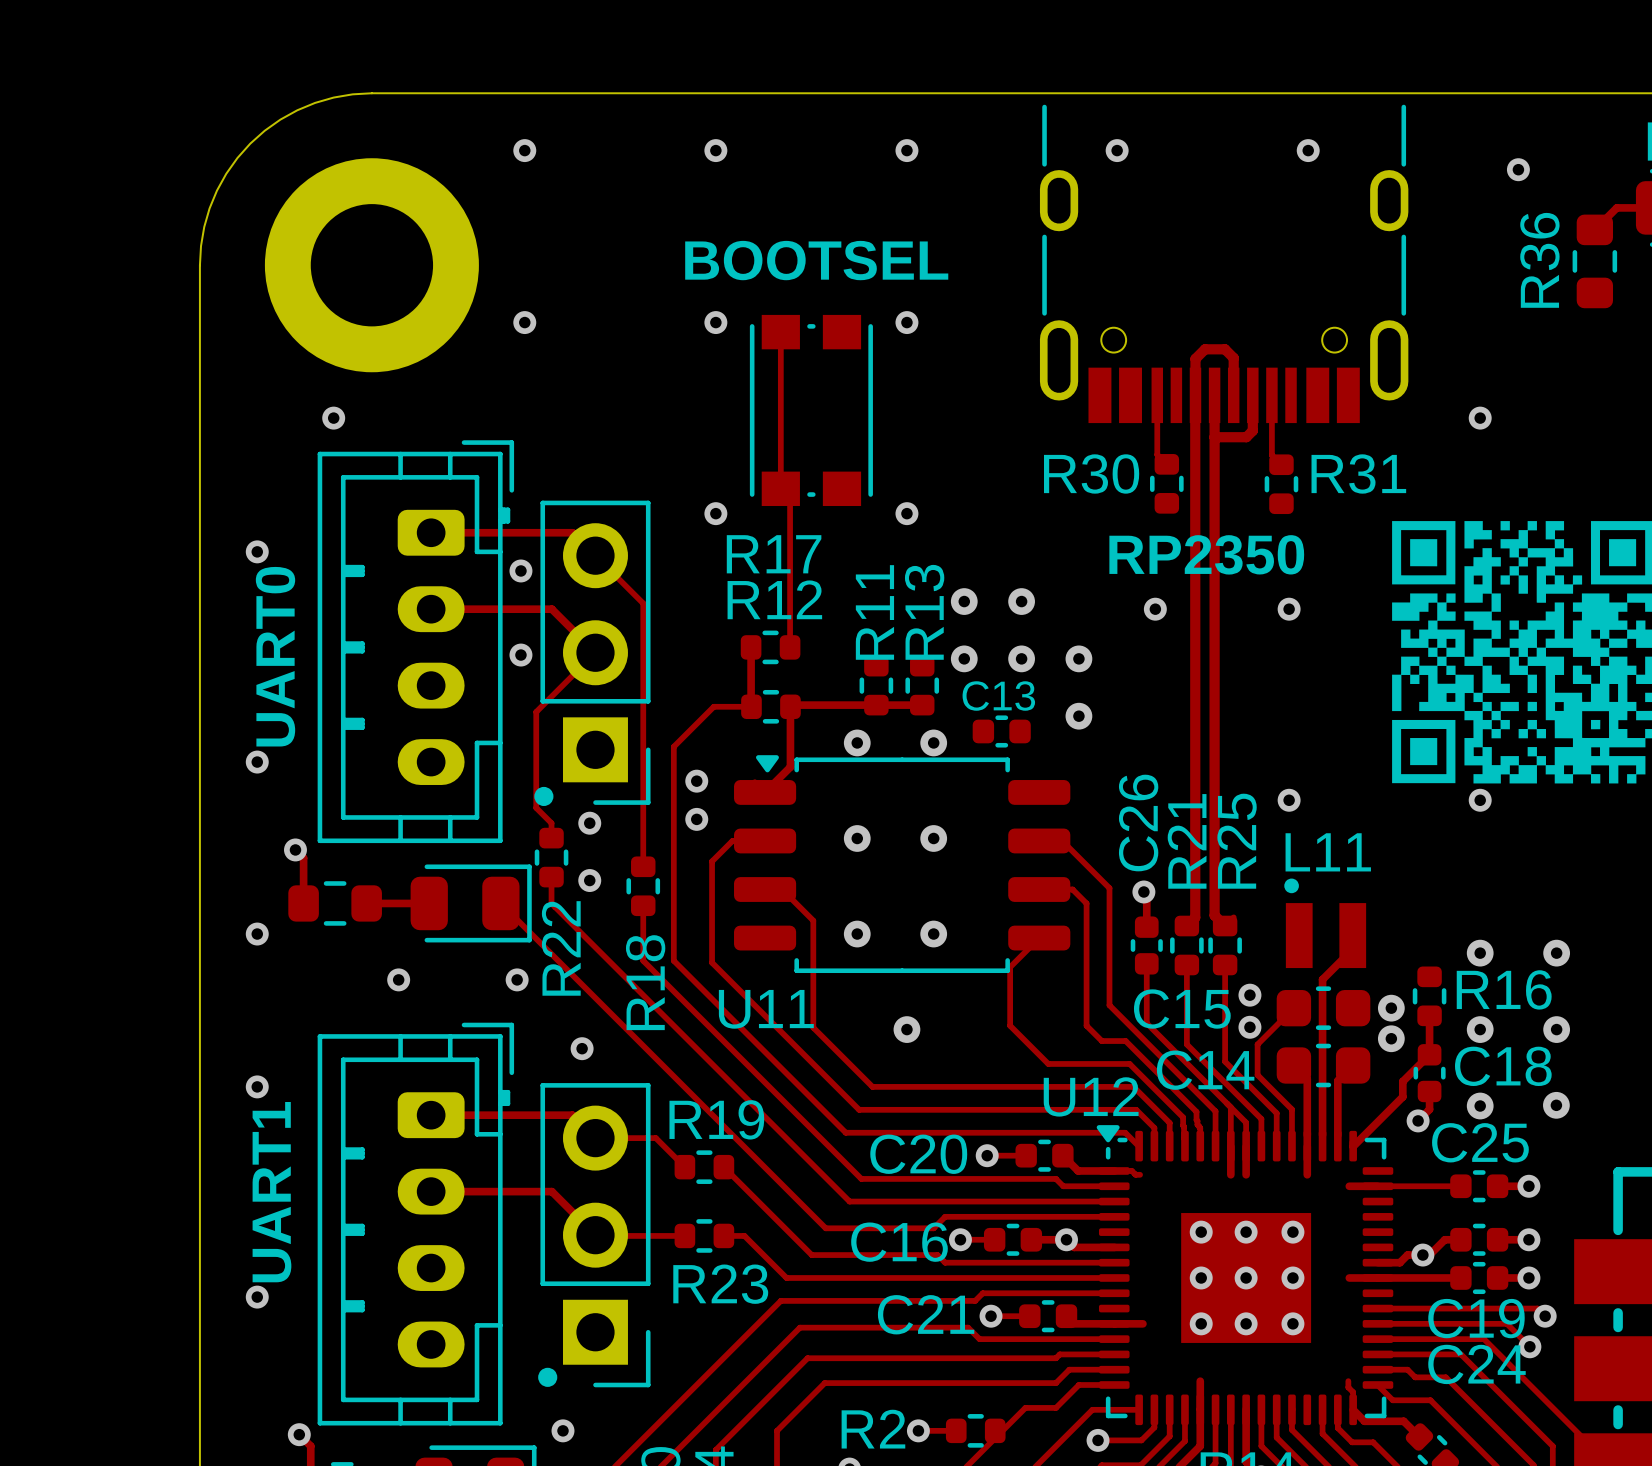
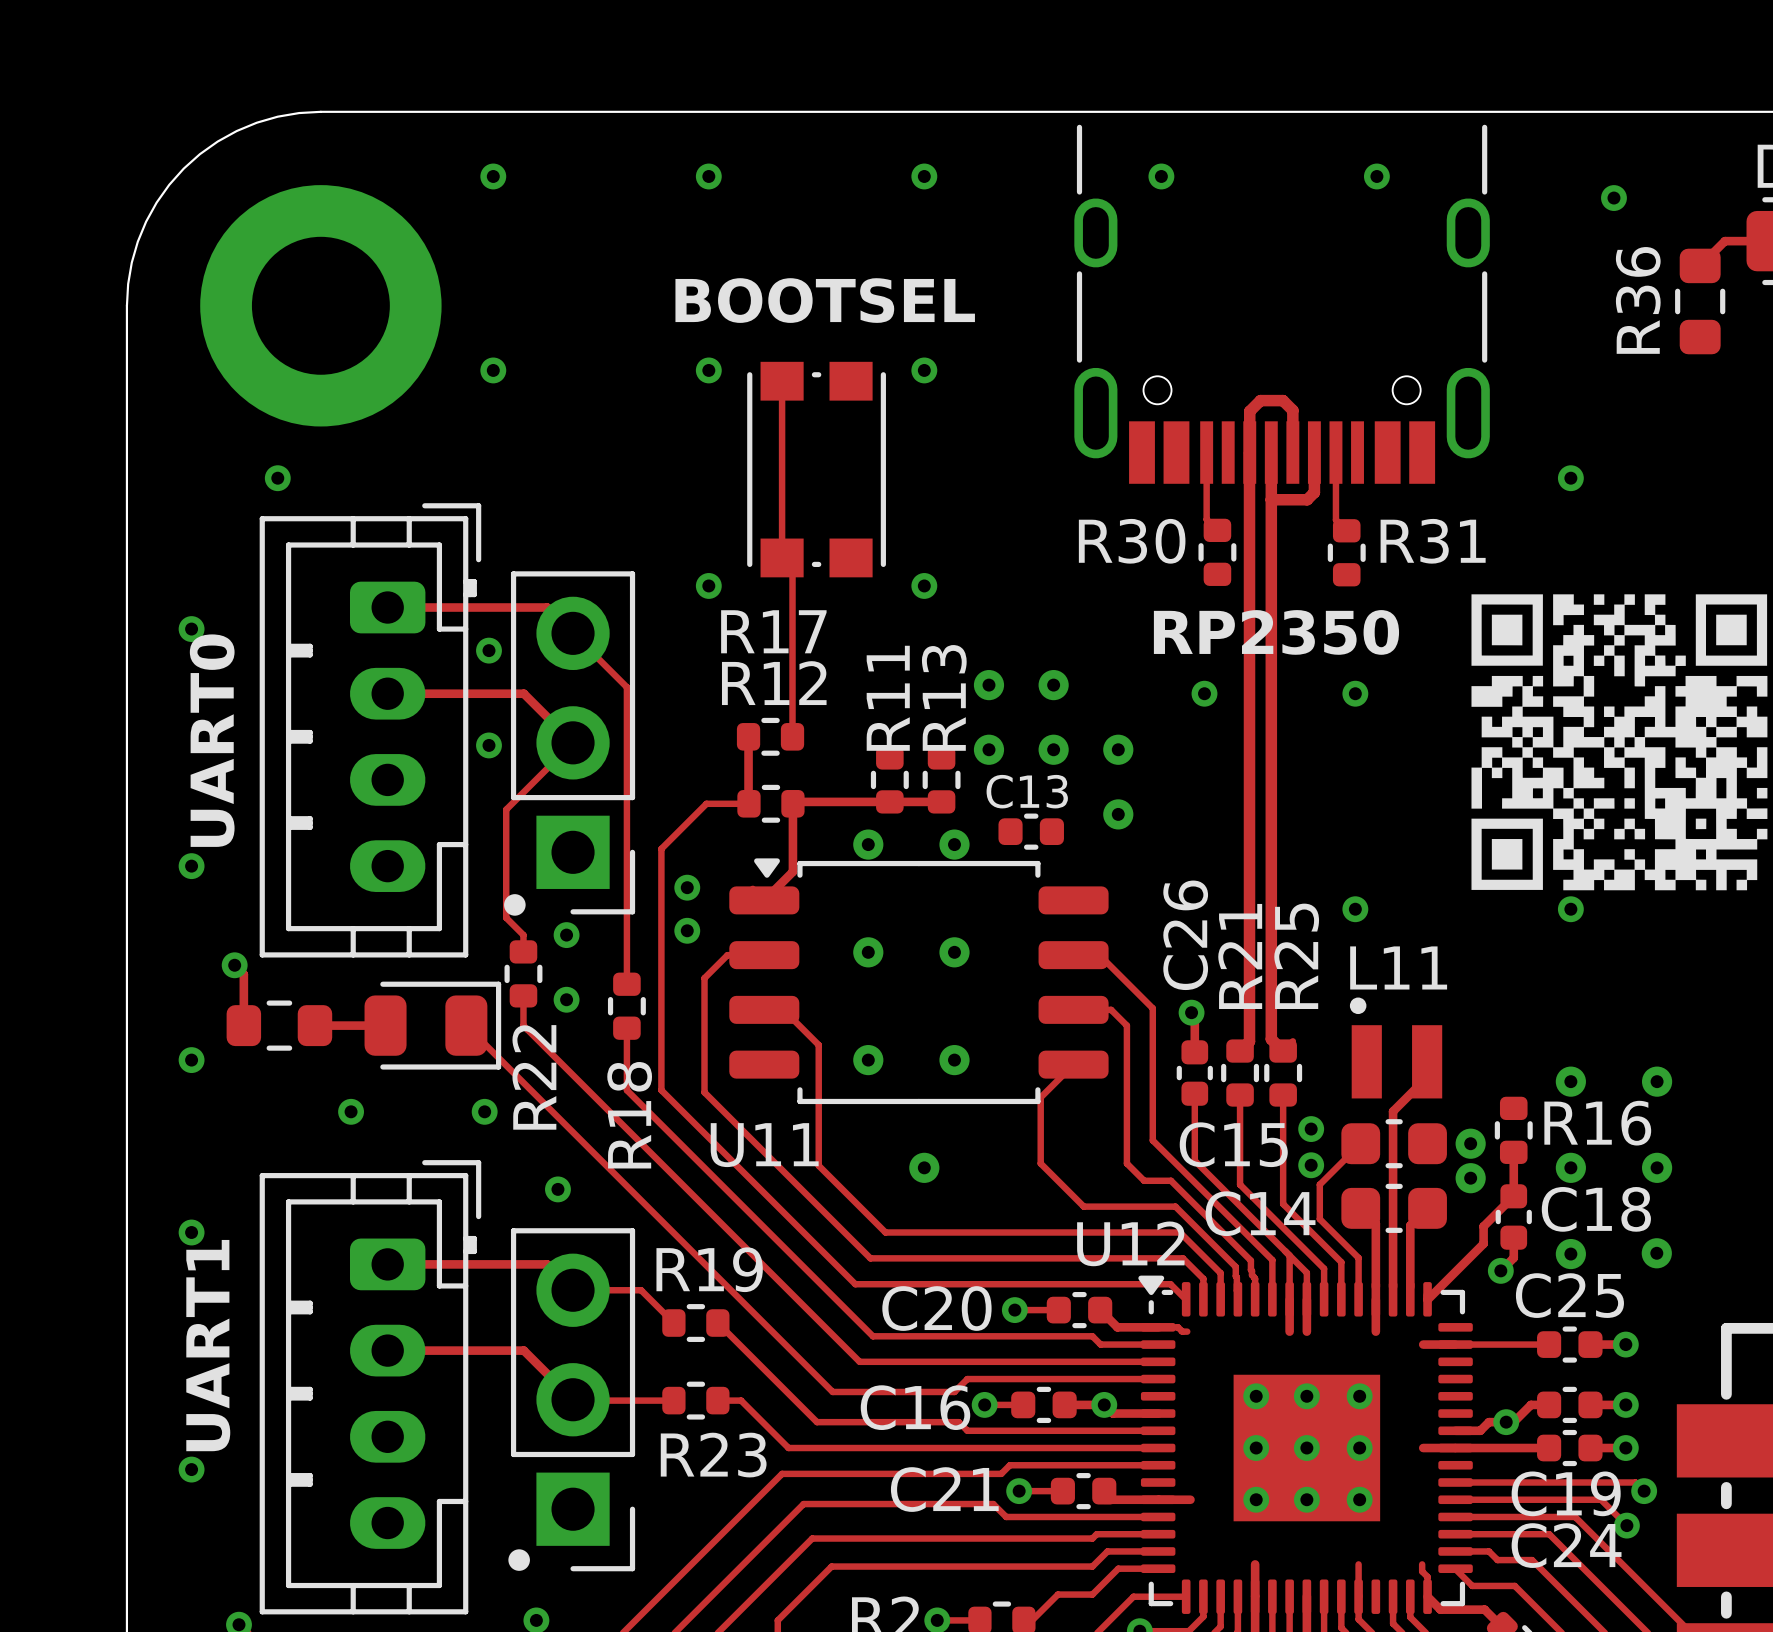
track: none -> (1358, 1564) (1358, 1596)

